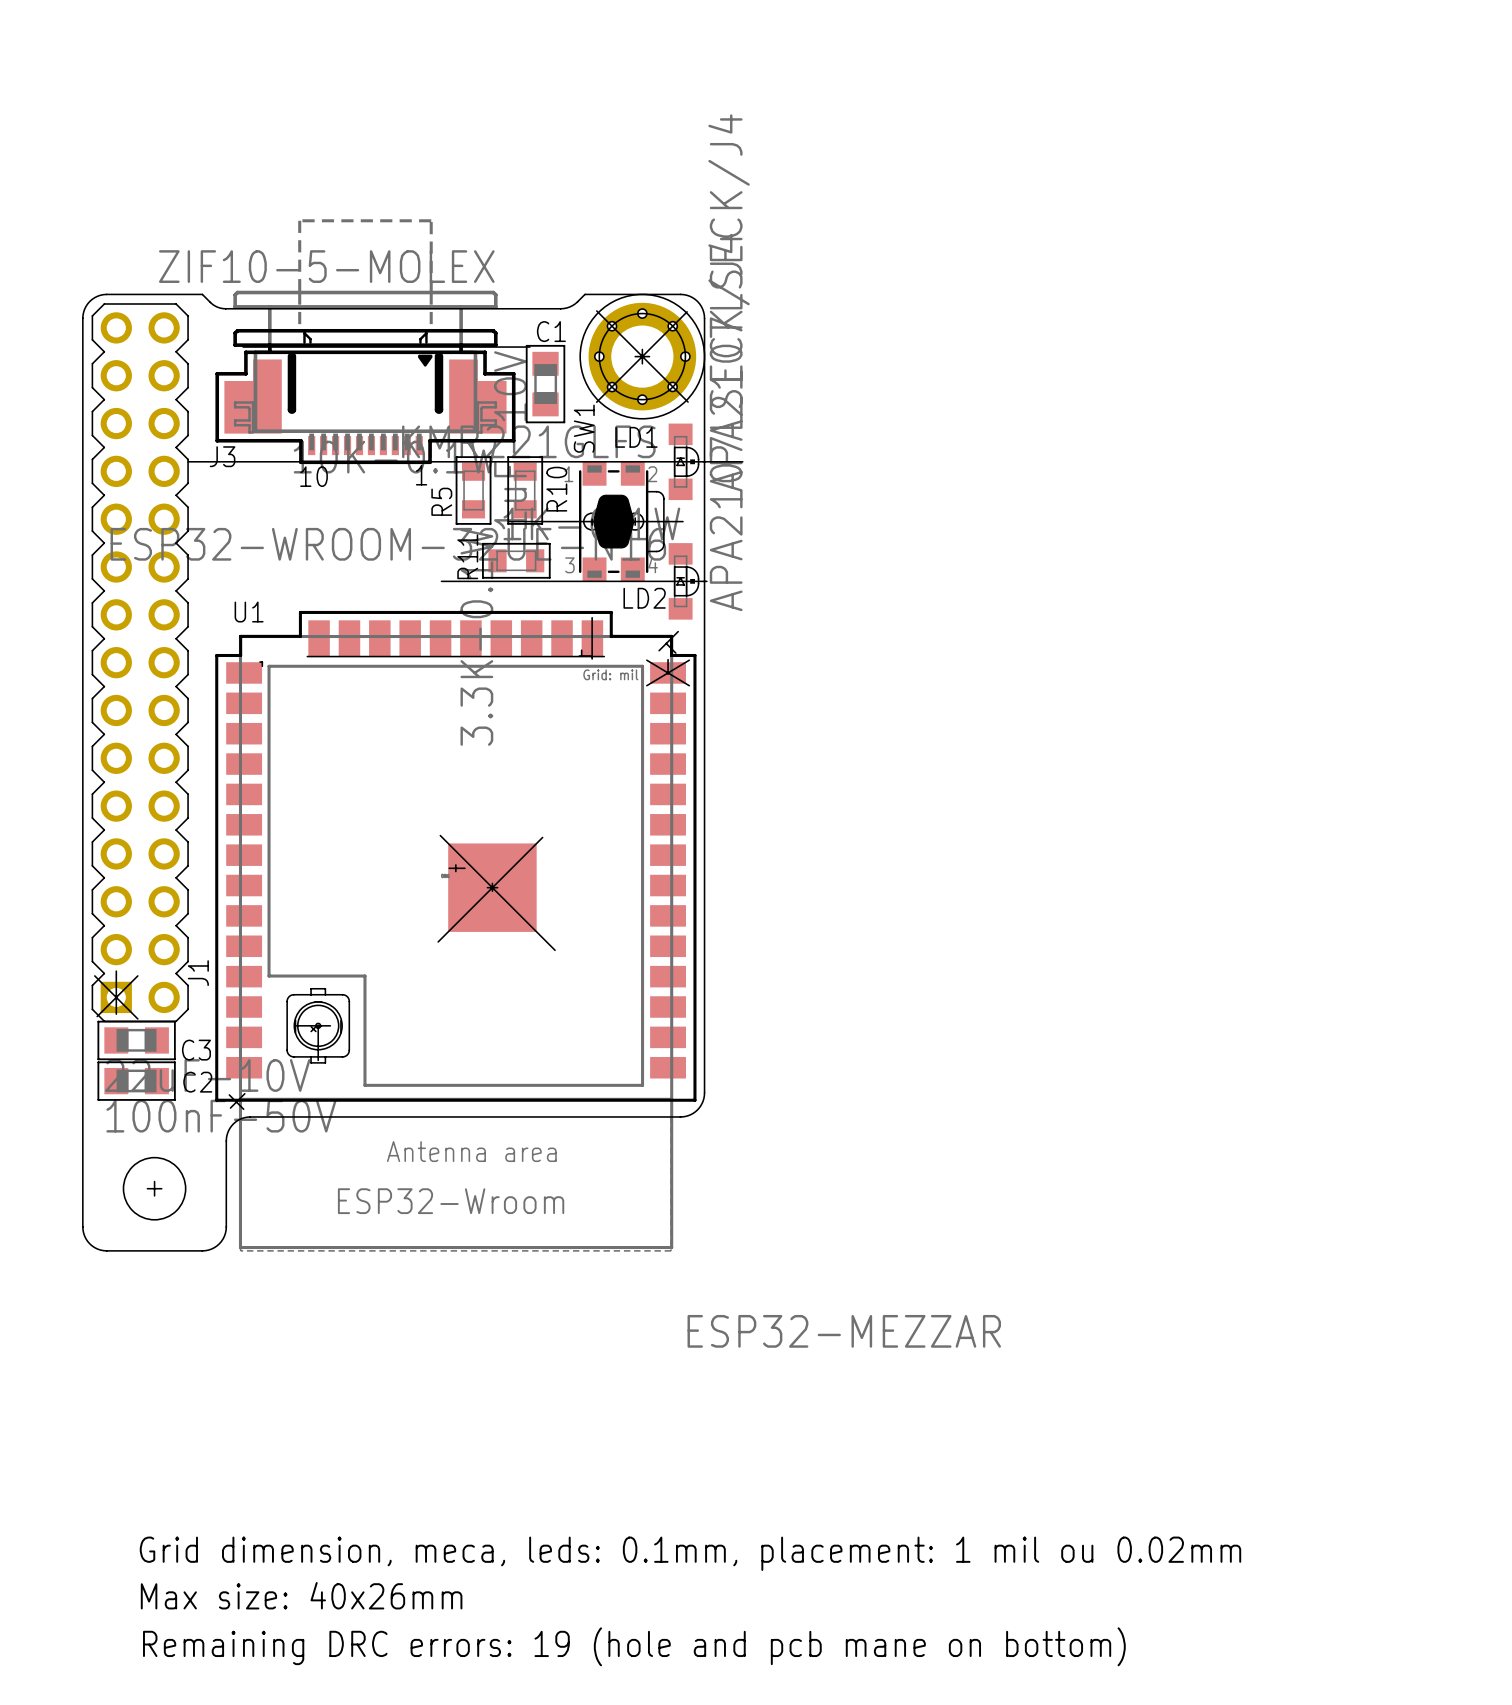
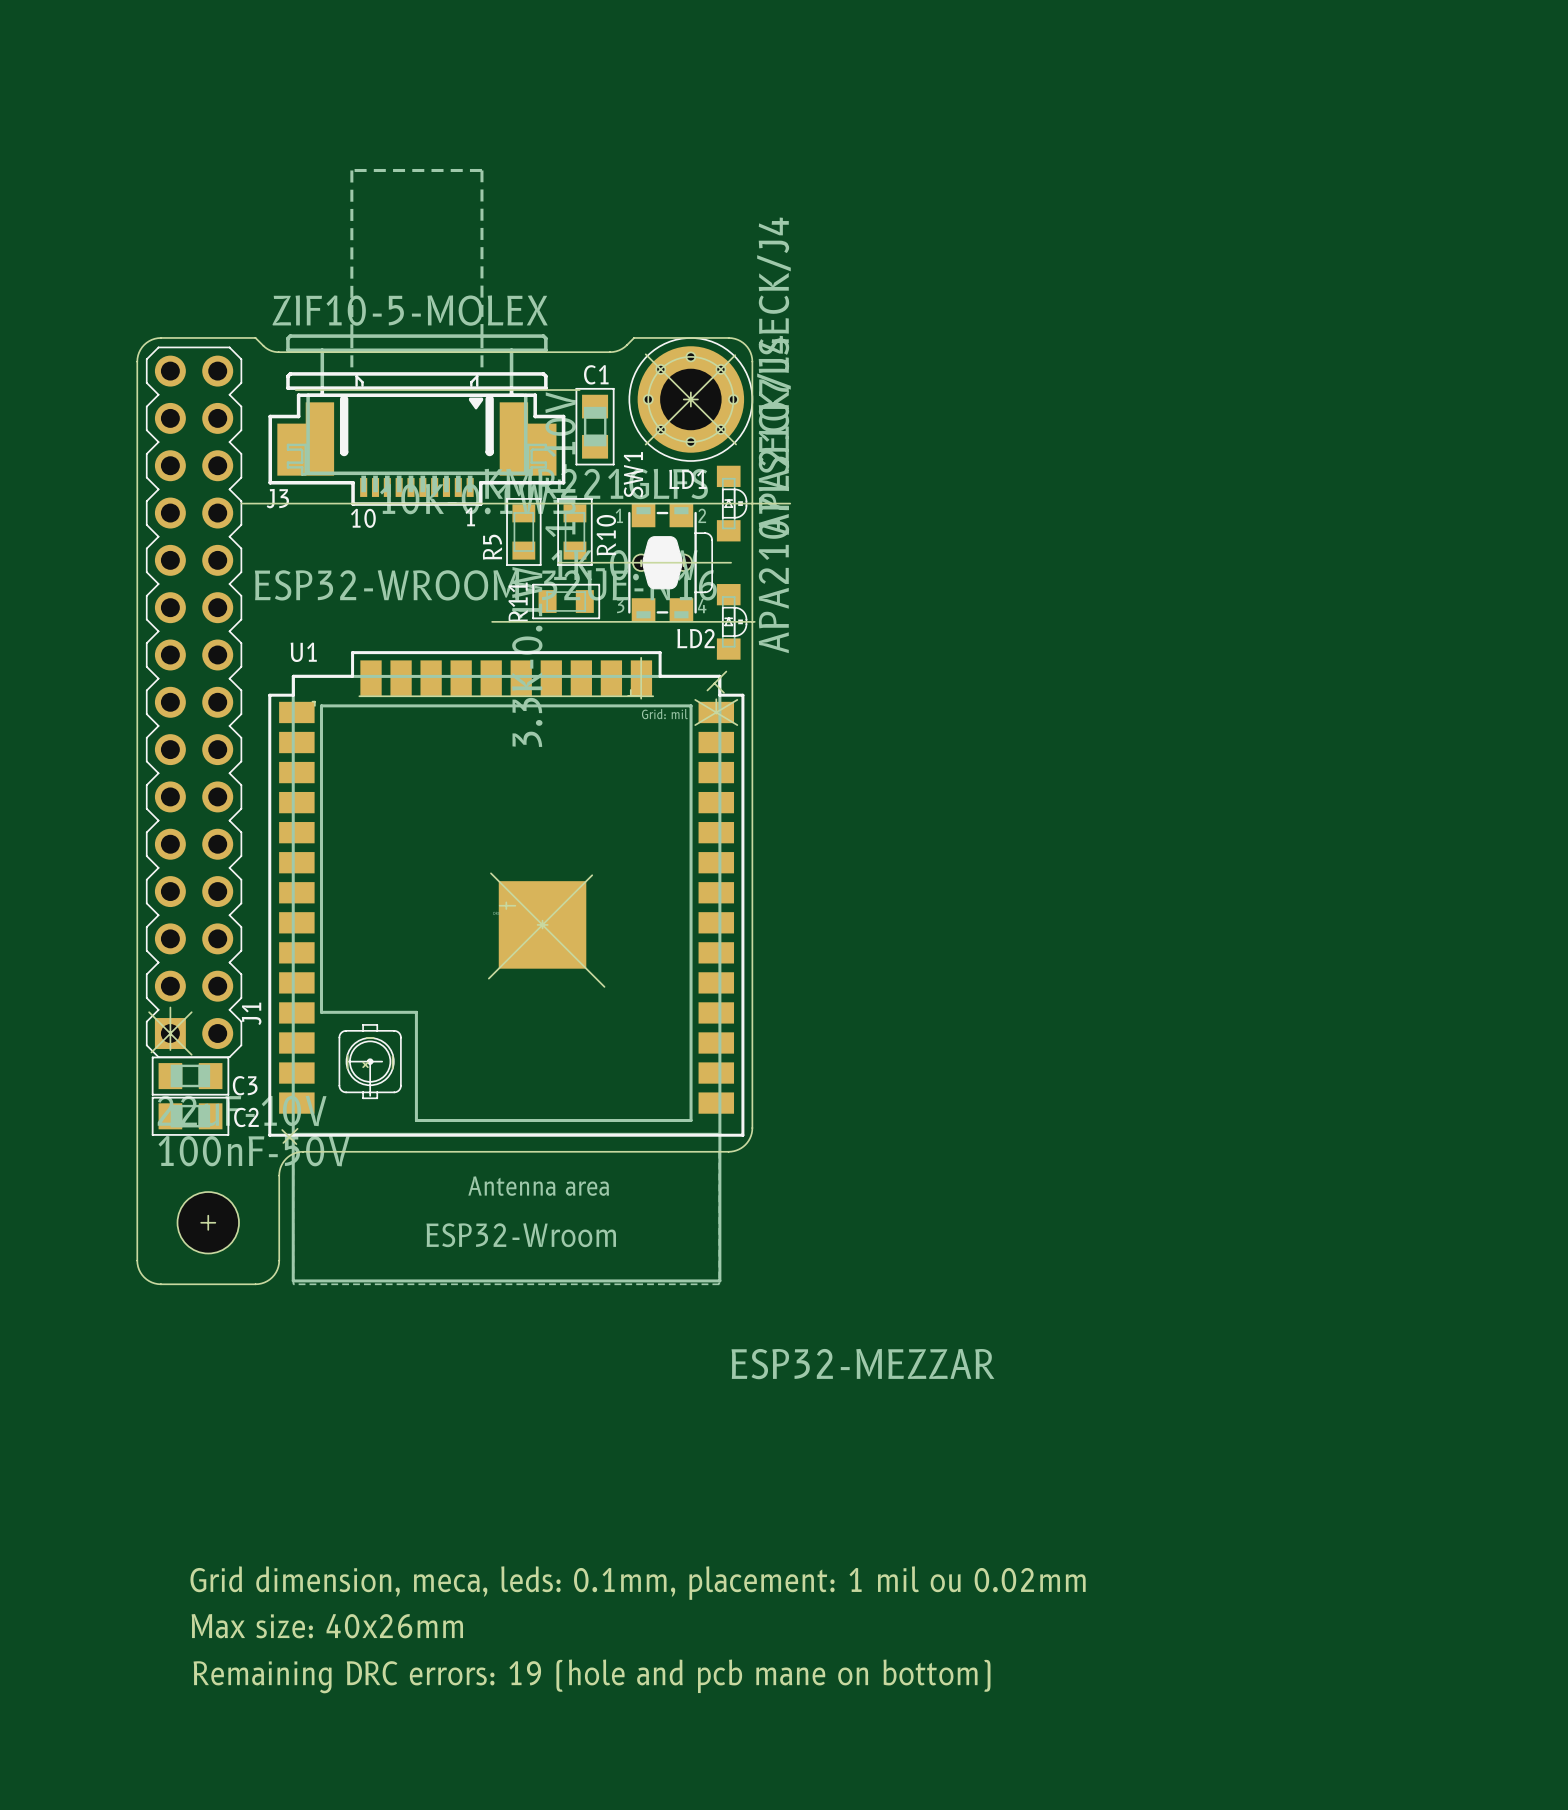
J3 footprint: [215, 219, 516, 465] -> [268, 168, 566, 506]

